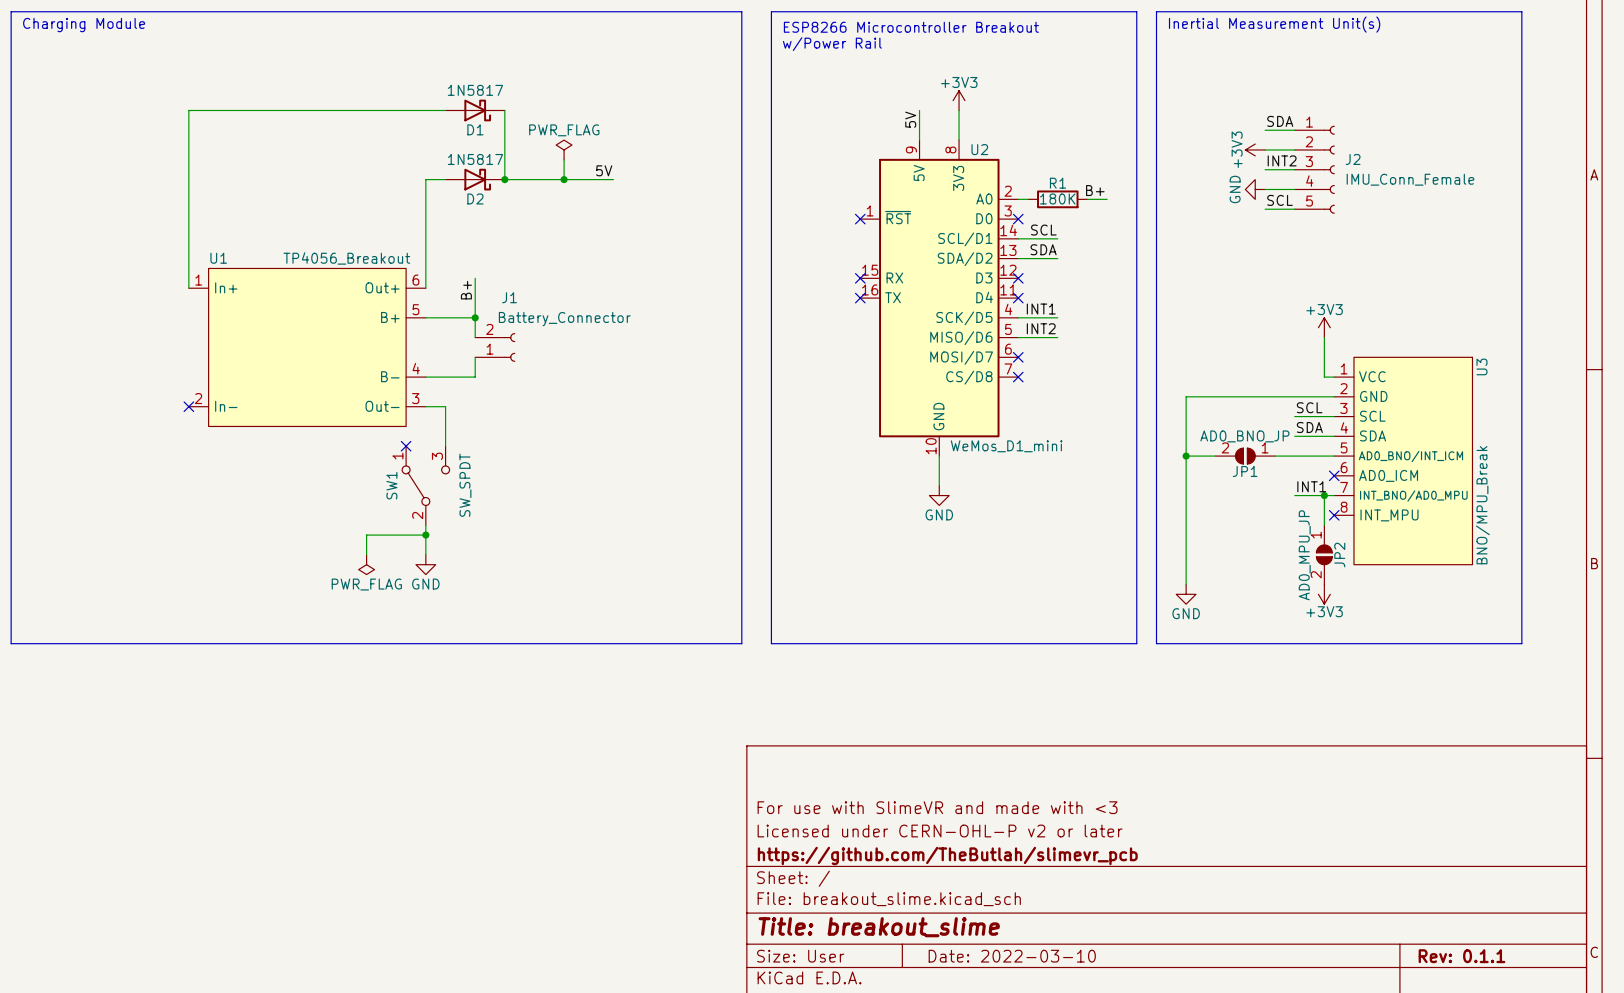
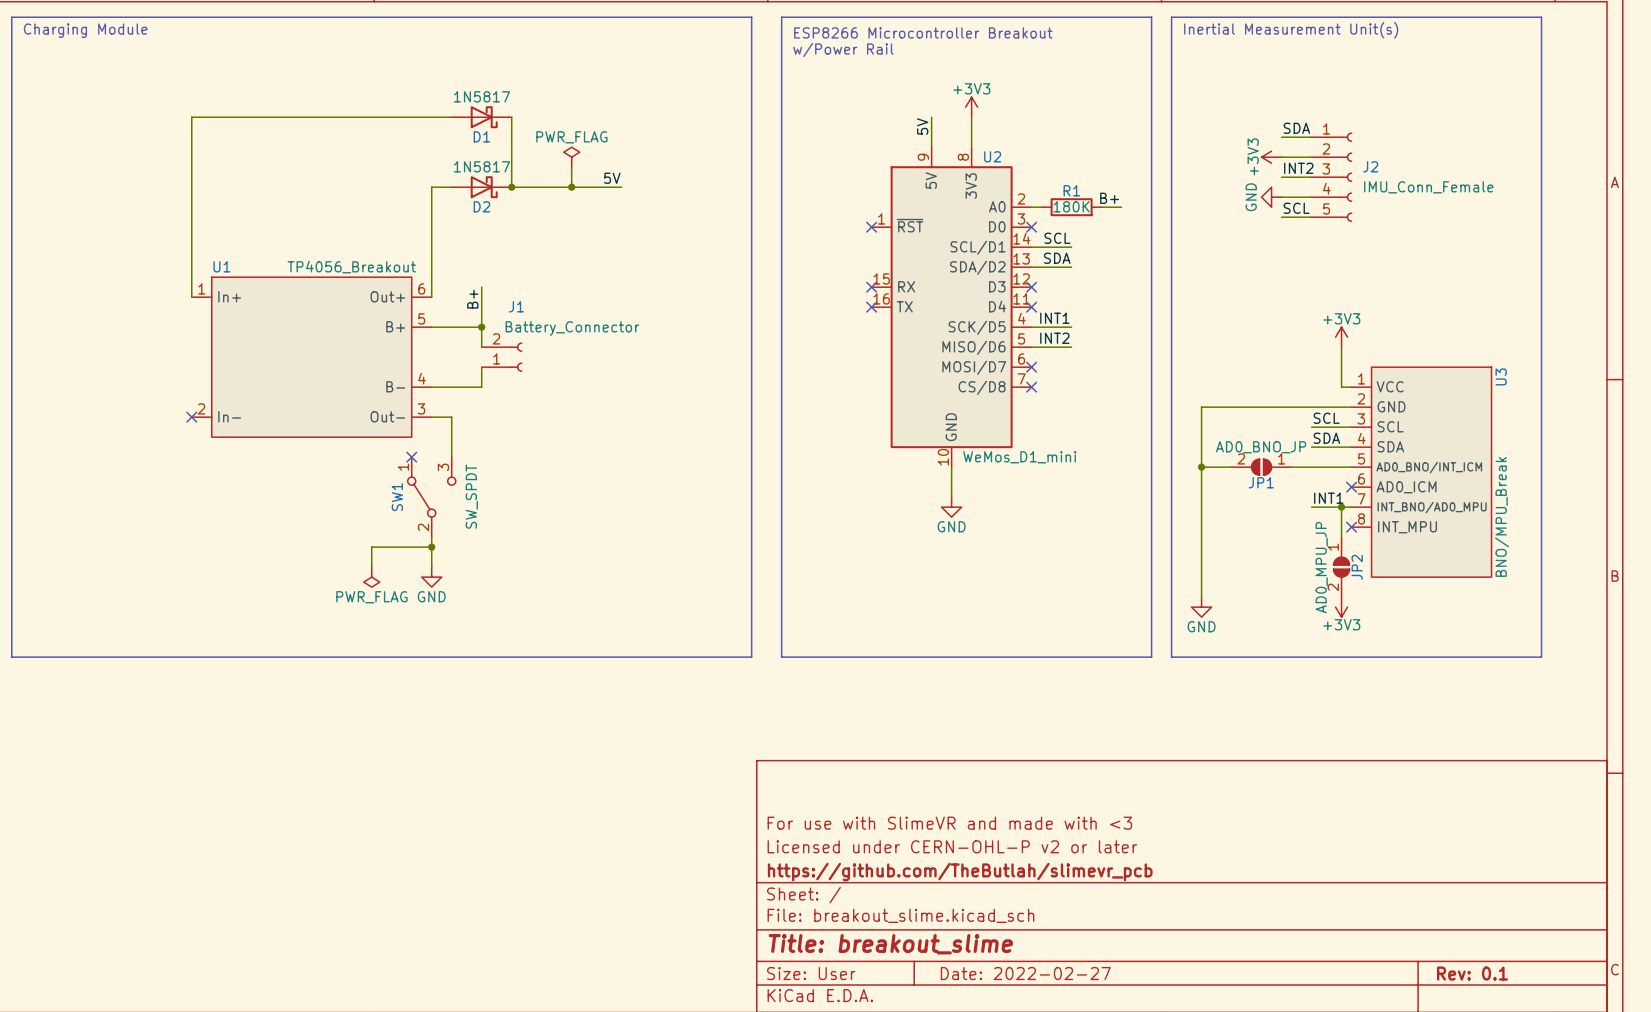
title block: Date: 2022-03-10 (1012, 956) -> Date: 2022-02-27 (1025, 973)
title block: Rev: 0.1.1 (1462, 956) -> Rev: 0.1 (1472, 973)

